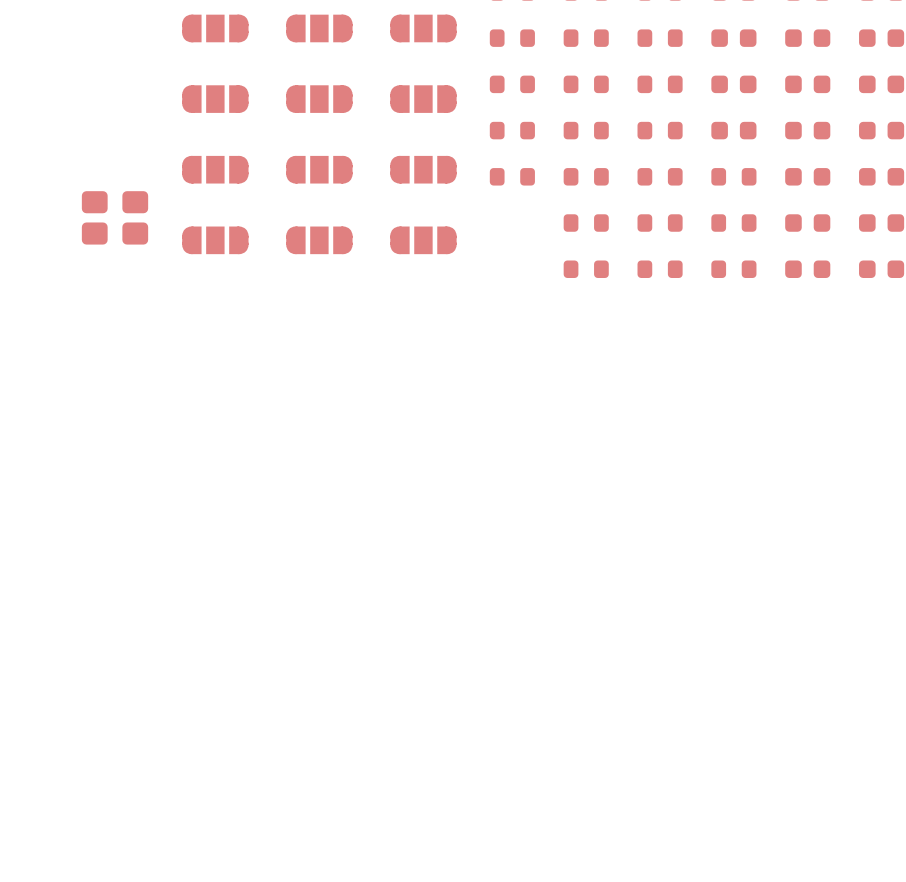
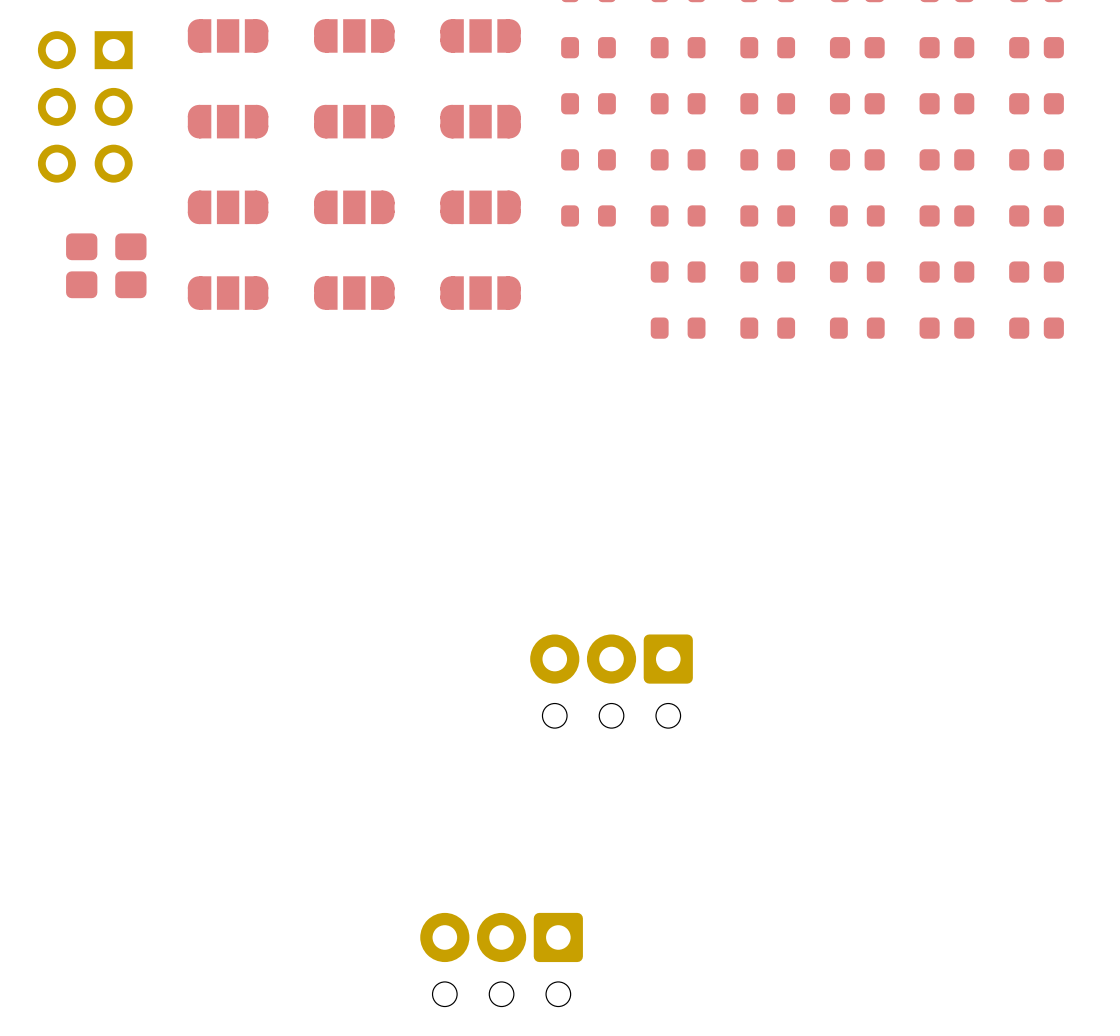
part: none -> (85, 106)
part: none -> (611, 681)
part: none -> (501, 959)

